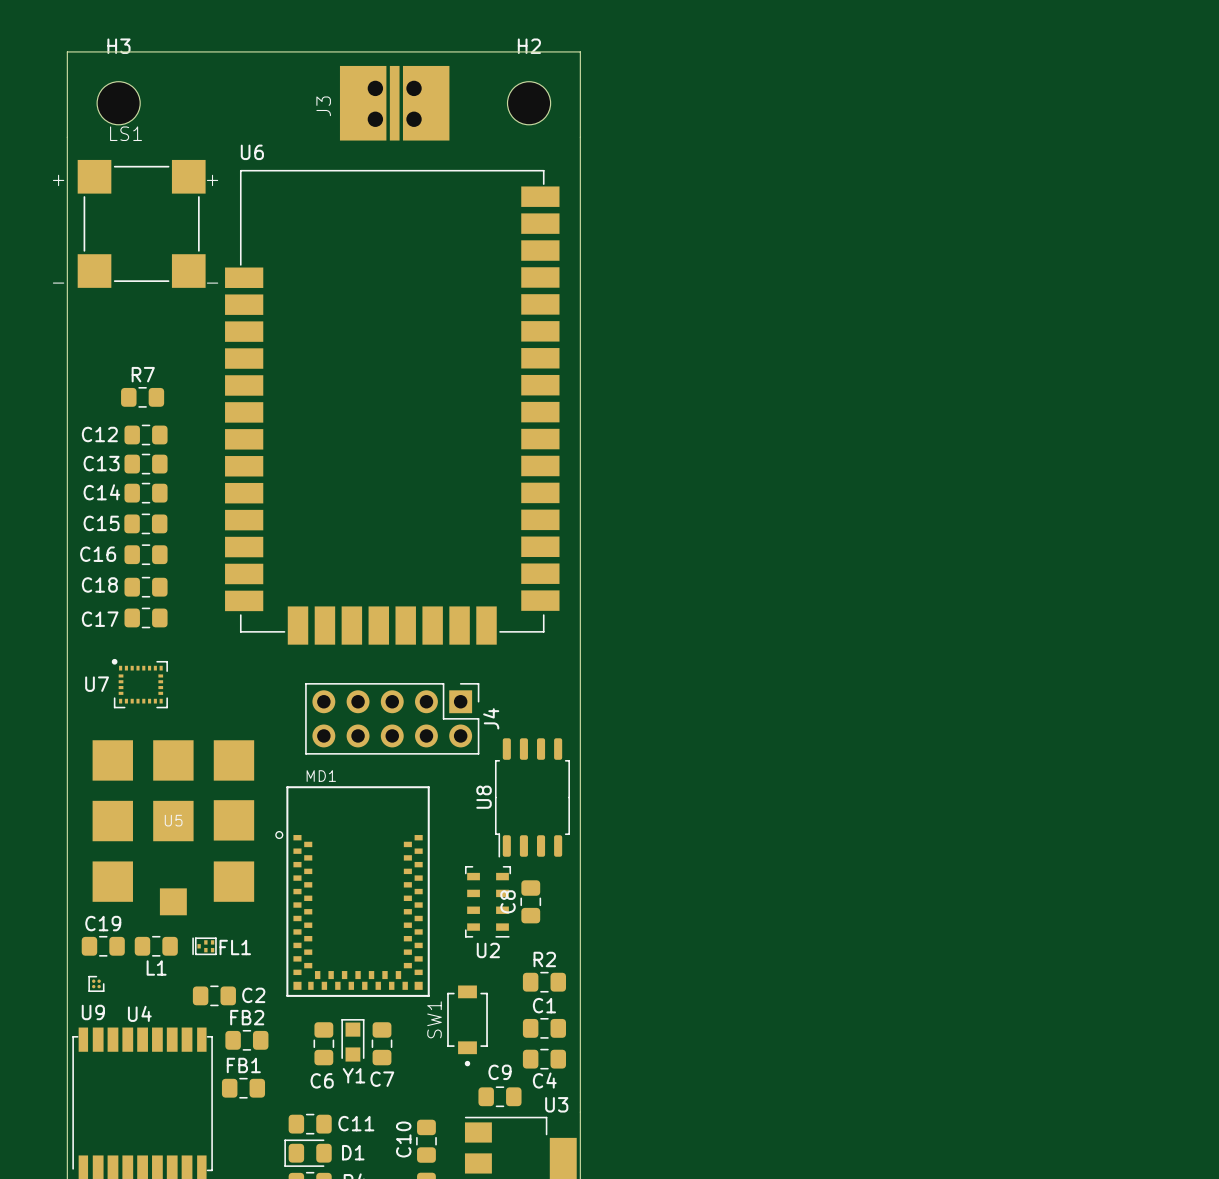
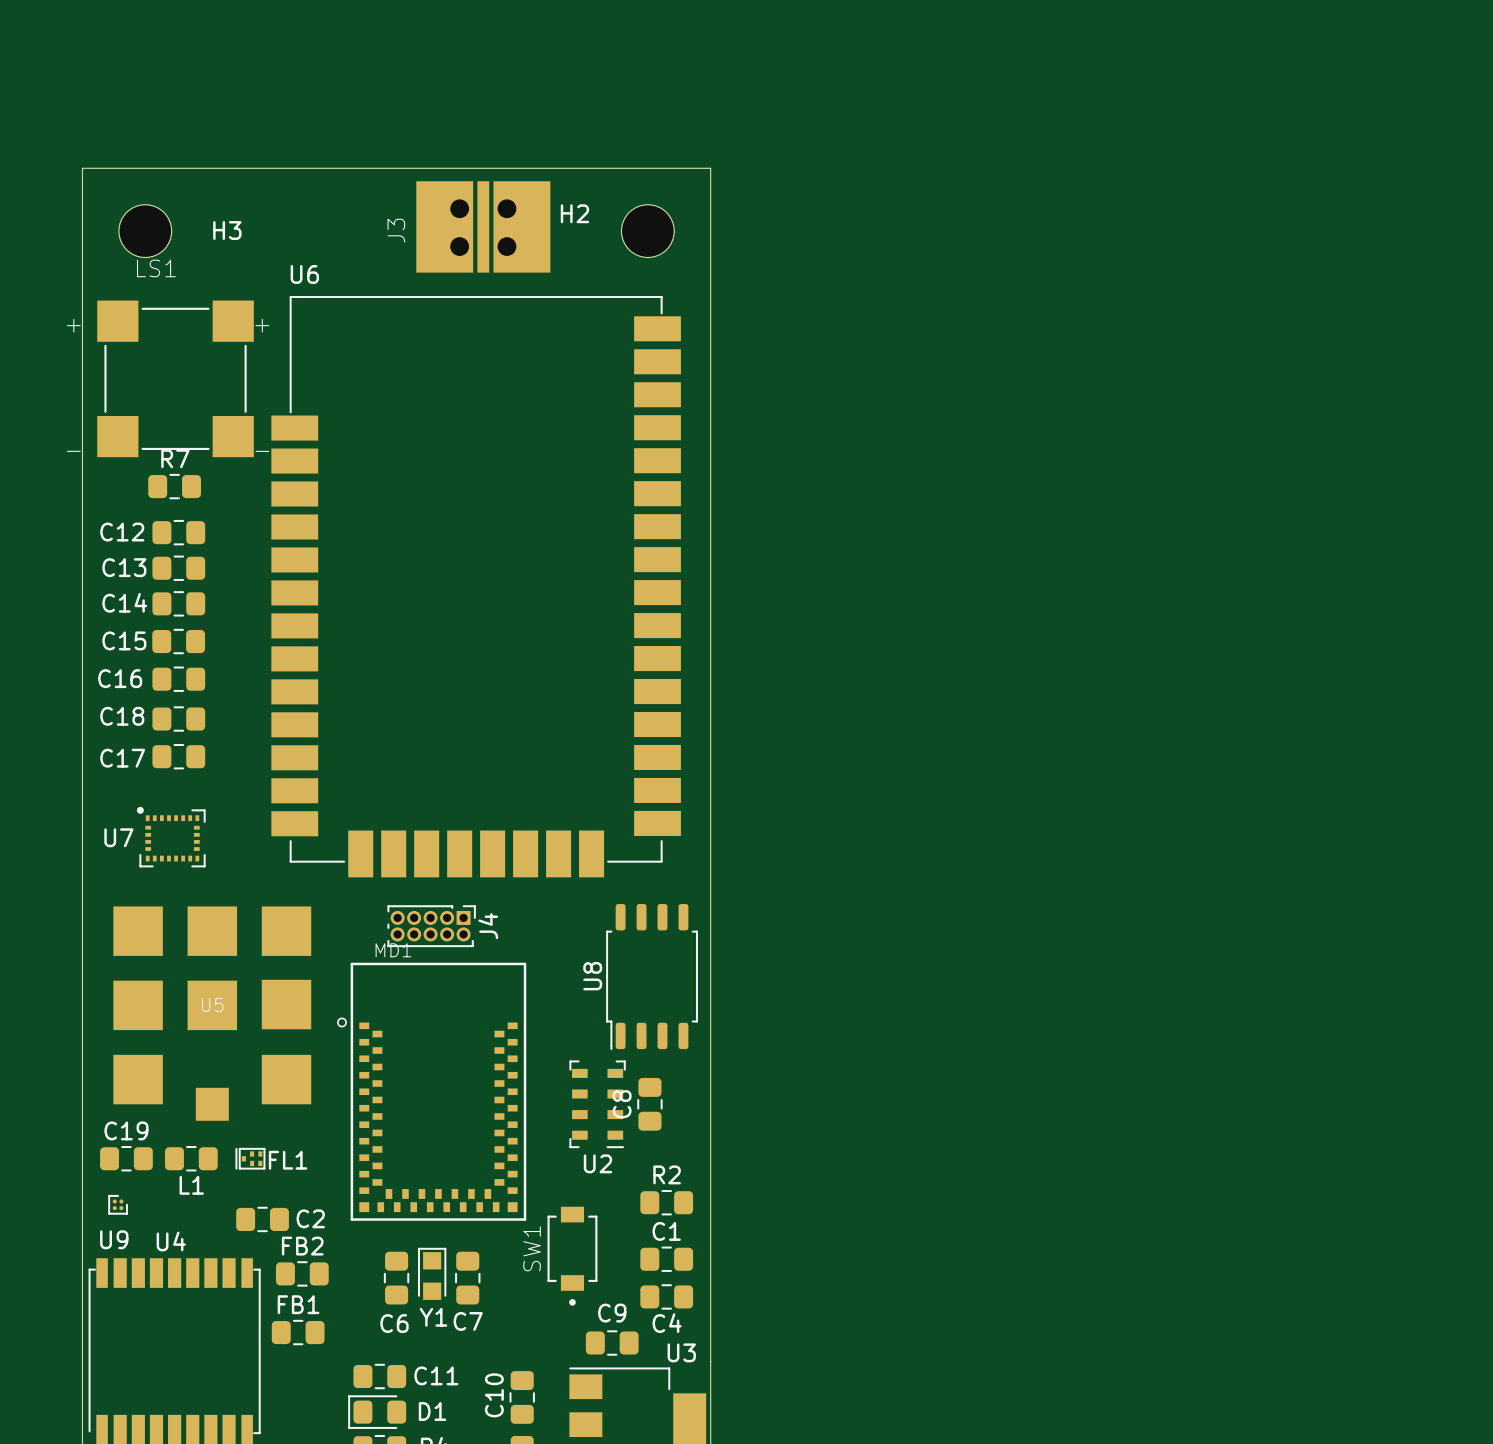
H3 name position: H3 (118, 46) -> H3 (227, 230)
H2 name position: H2 (529, 46) -> H2 (574, 213)
H3 position: (118, 103) -> (145, 231)
J3 position: (394, 103) -> (483, 226)
H2 position: (529, 103) -> (647, 231)
board edge: (67, 137) (67, 51) (580, 51) (580, 137) -> (82, 168) (710, 168)
LS1 position: (141, 223) -> (175, 378)
U6 position: (392, 407) -> (476, 586)
J4 footprint: [305, 683, 480, 755] -> [387, 905, 476, 948]
J4 name position: J4 (491, 718) -> J4 (488, 926)

